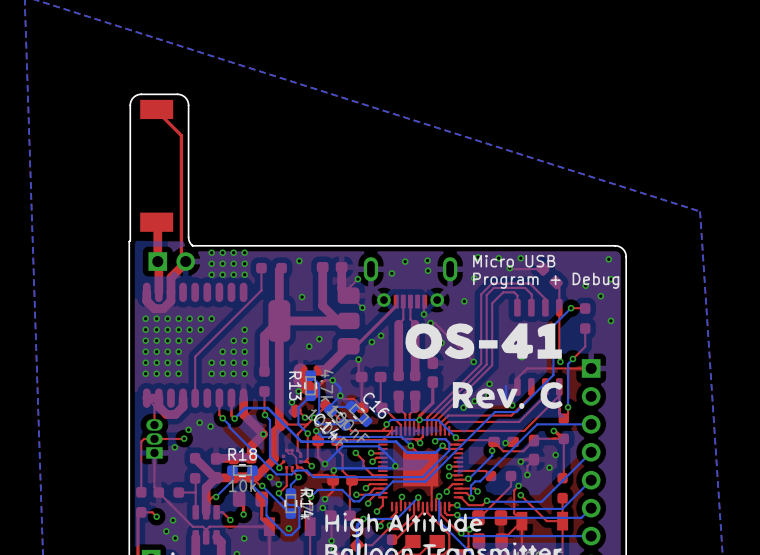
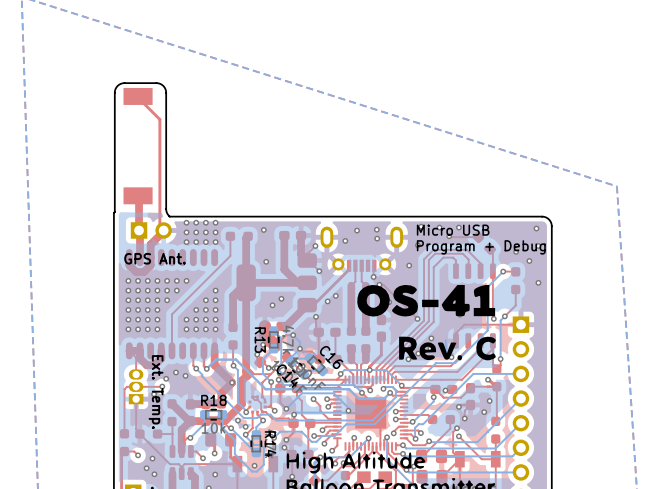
text: none -> GPS Ant. (154, 258)
text: none -> Ext. Temp. (156, 392)

